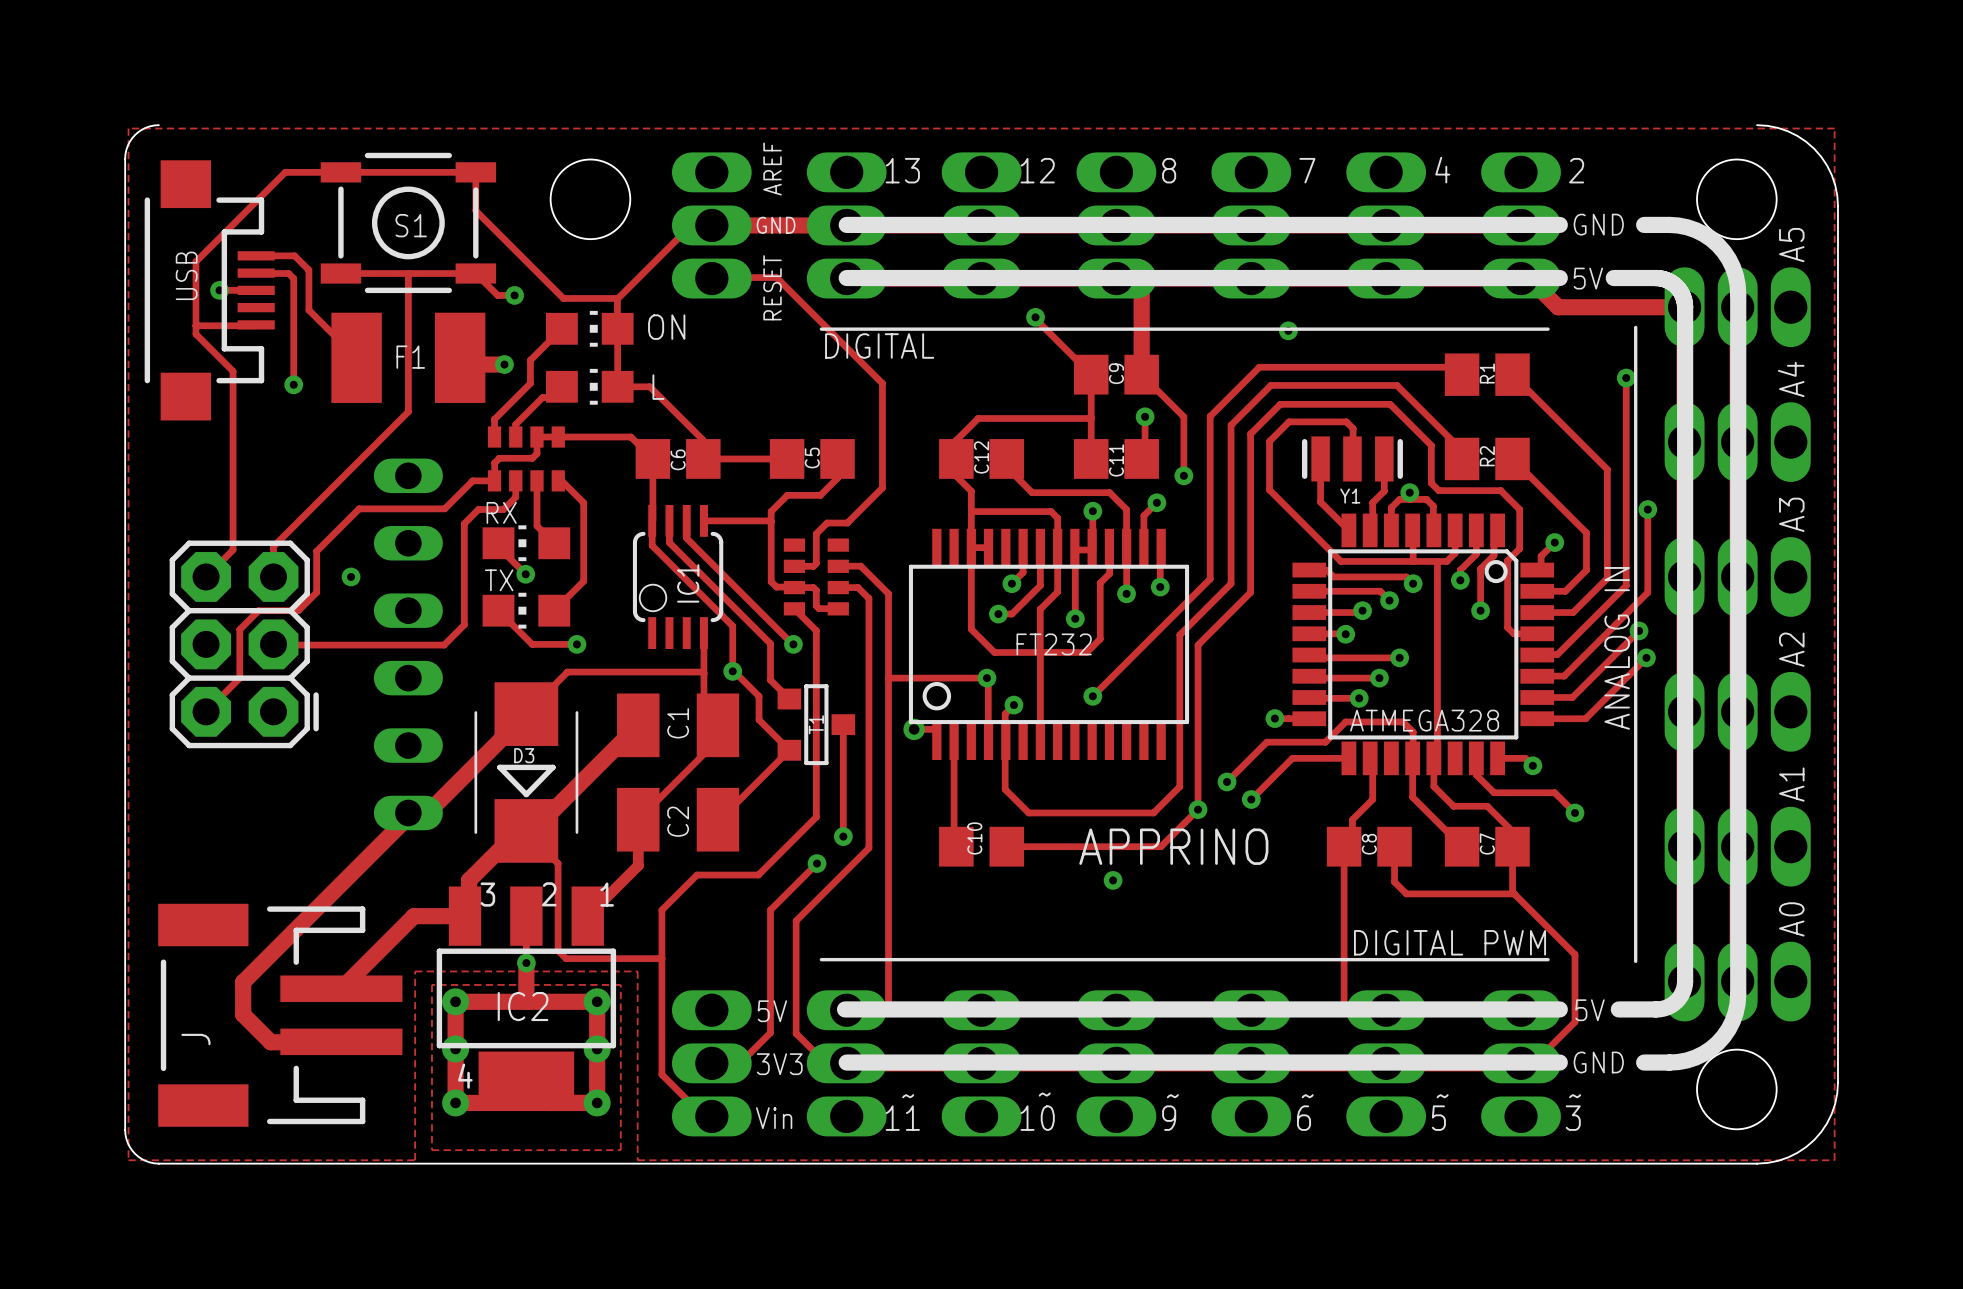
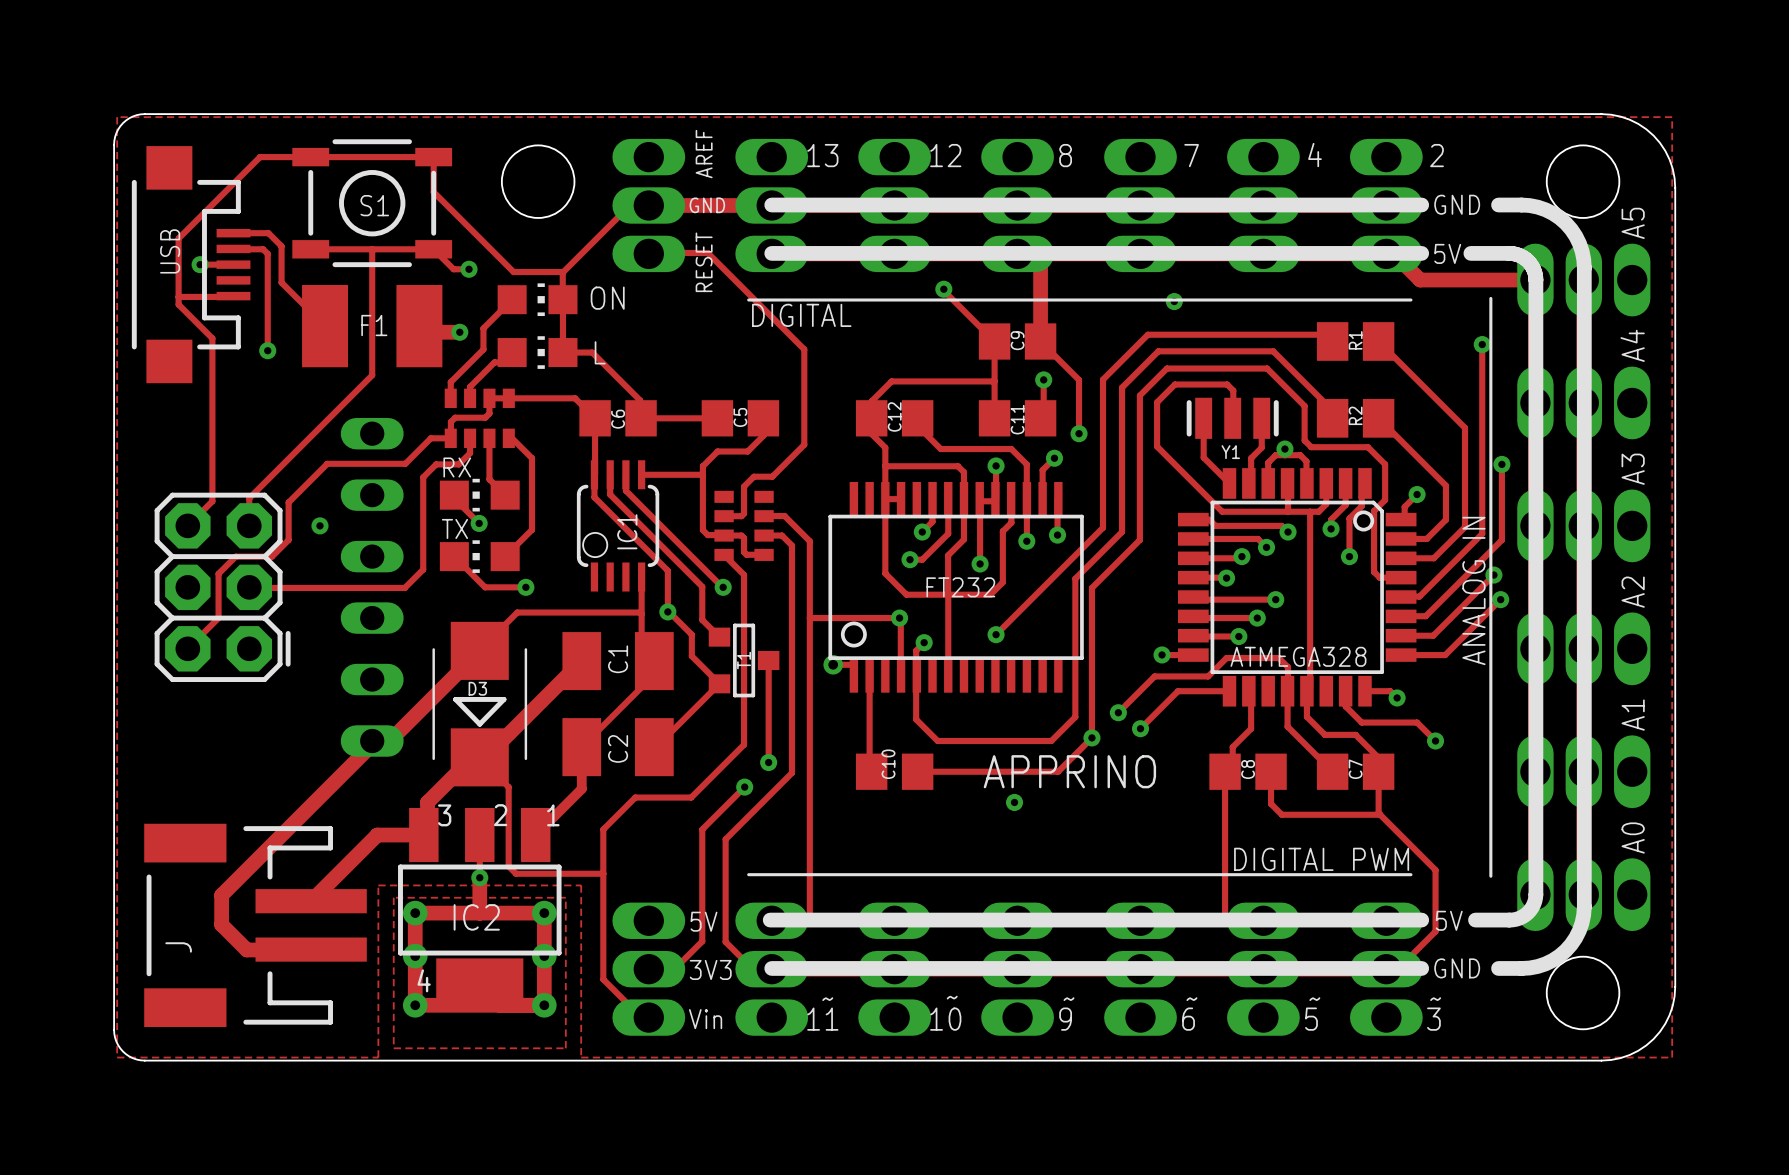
board edge: none -> (144, 114) (1601, 114)

